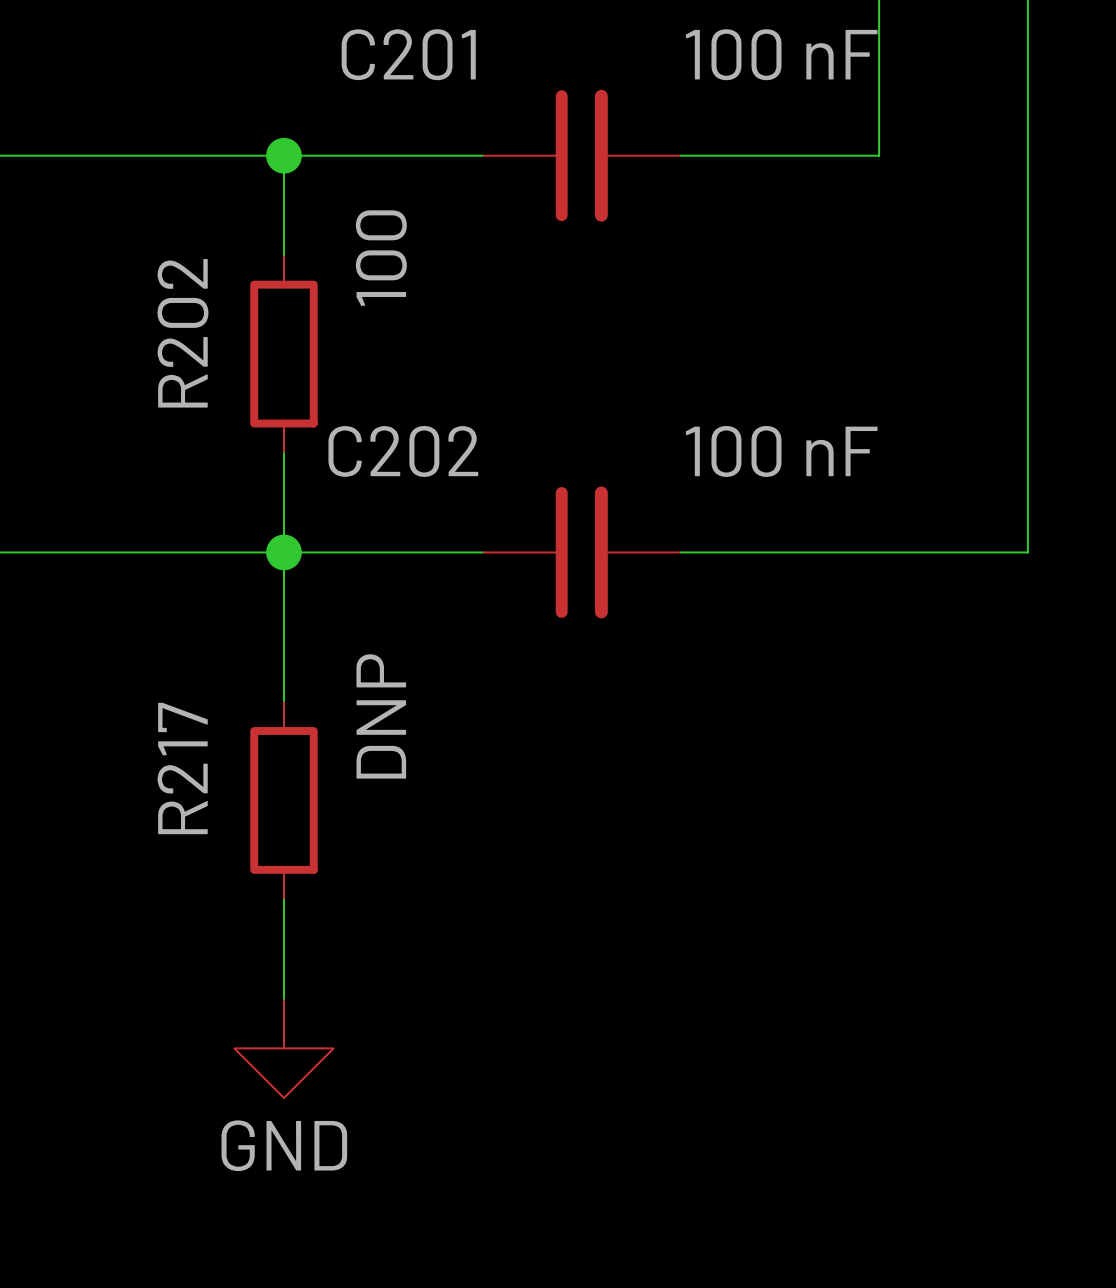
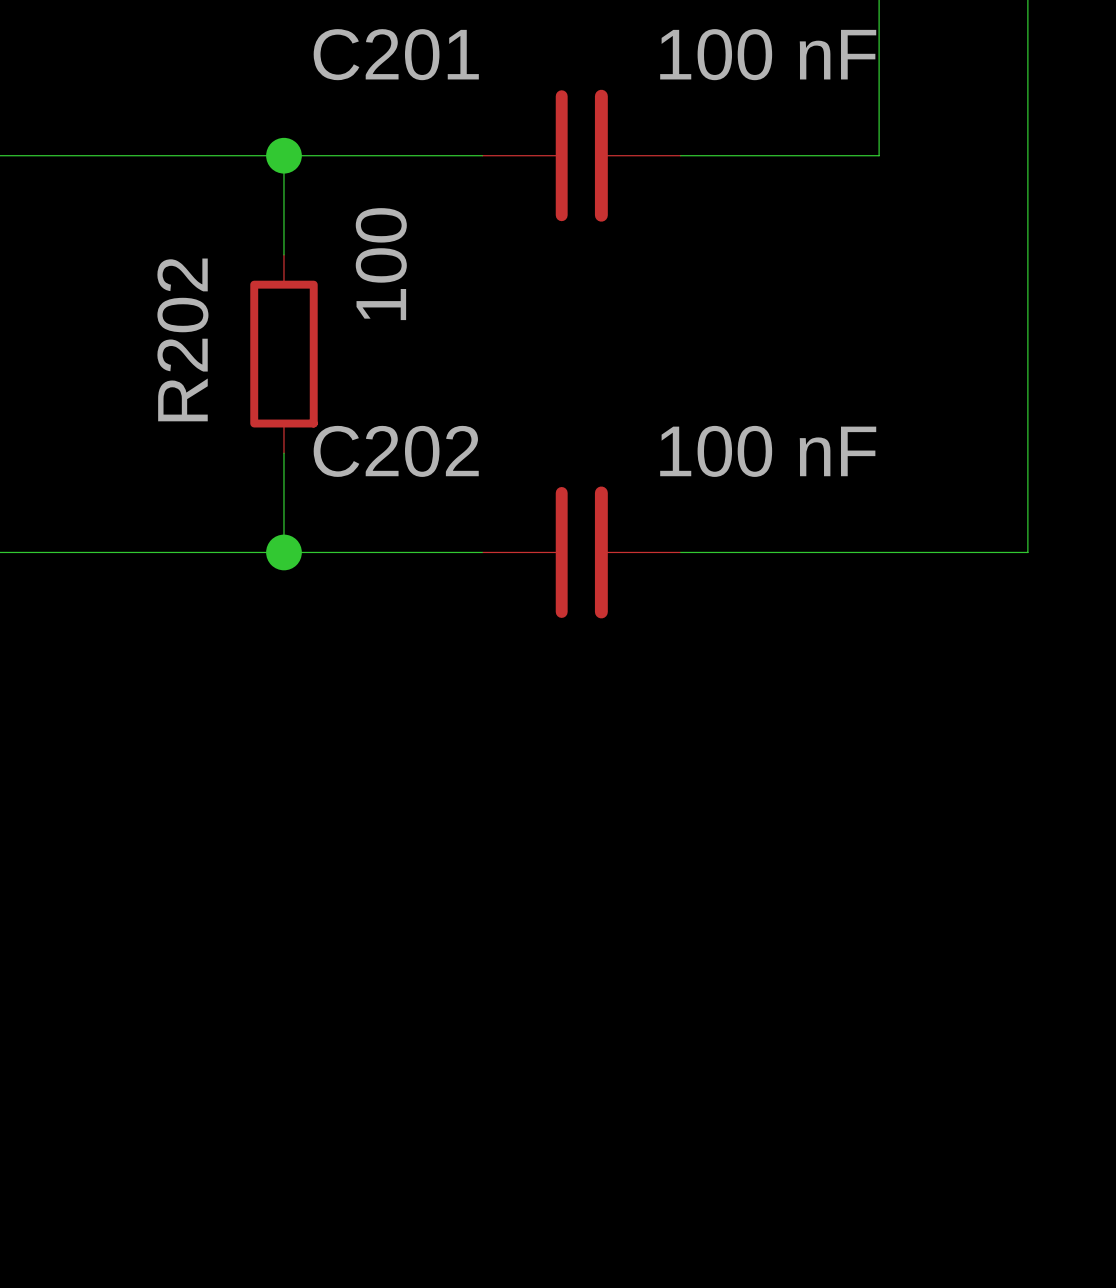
wire: (283, 552) (283, 701) -> none
R217: DNP (283, 800) -> none
wire: (283, 899) (283, 998) -> none
power symbol: GND (283, 1048) -> none

